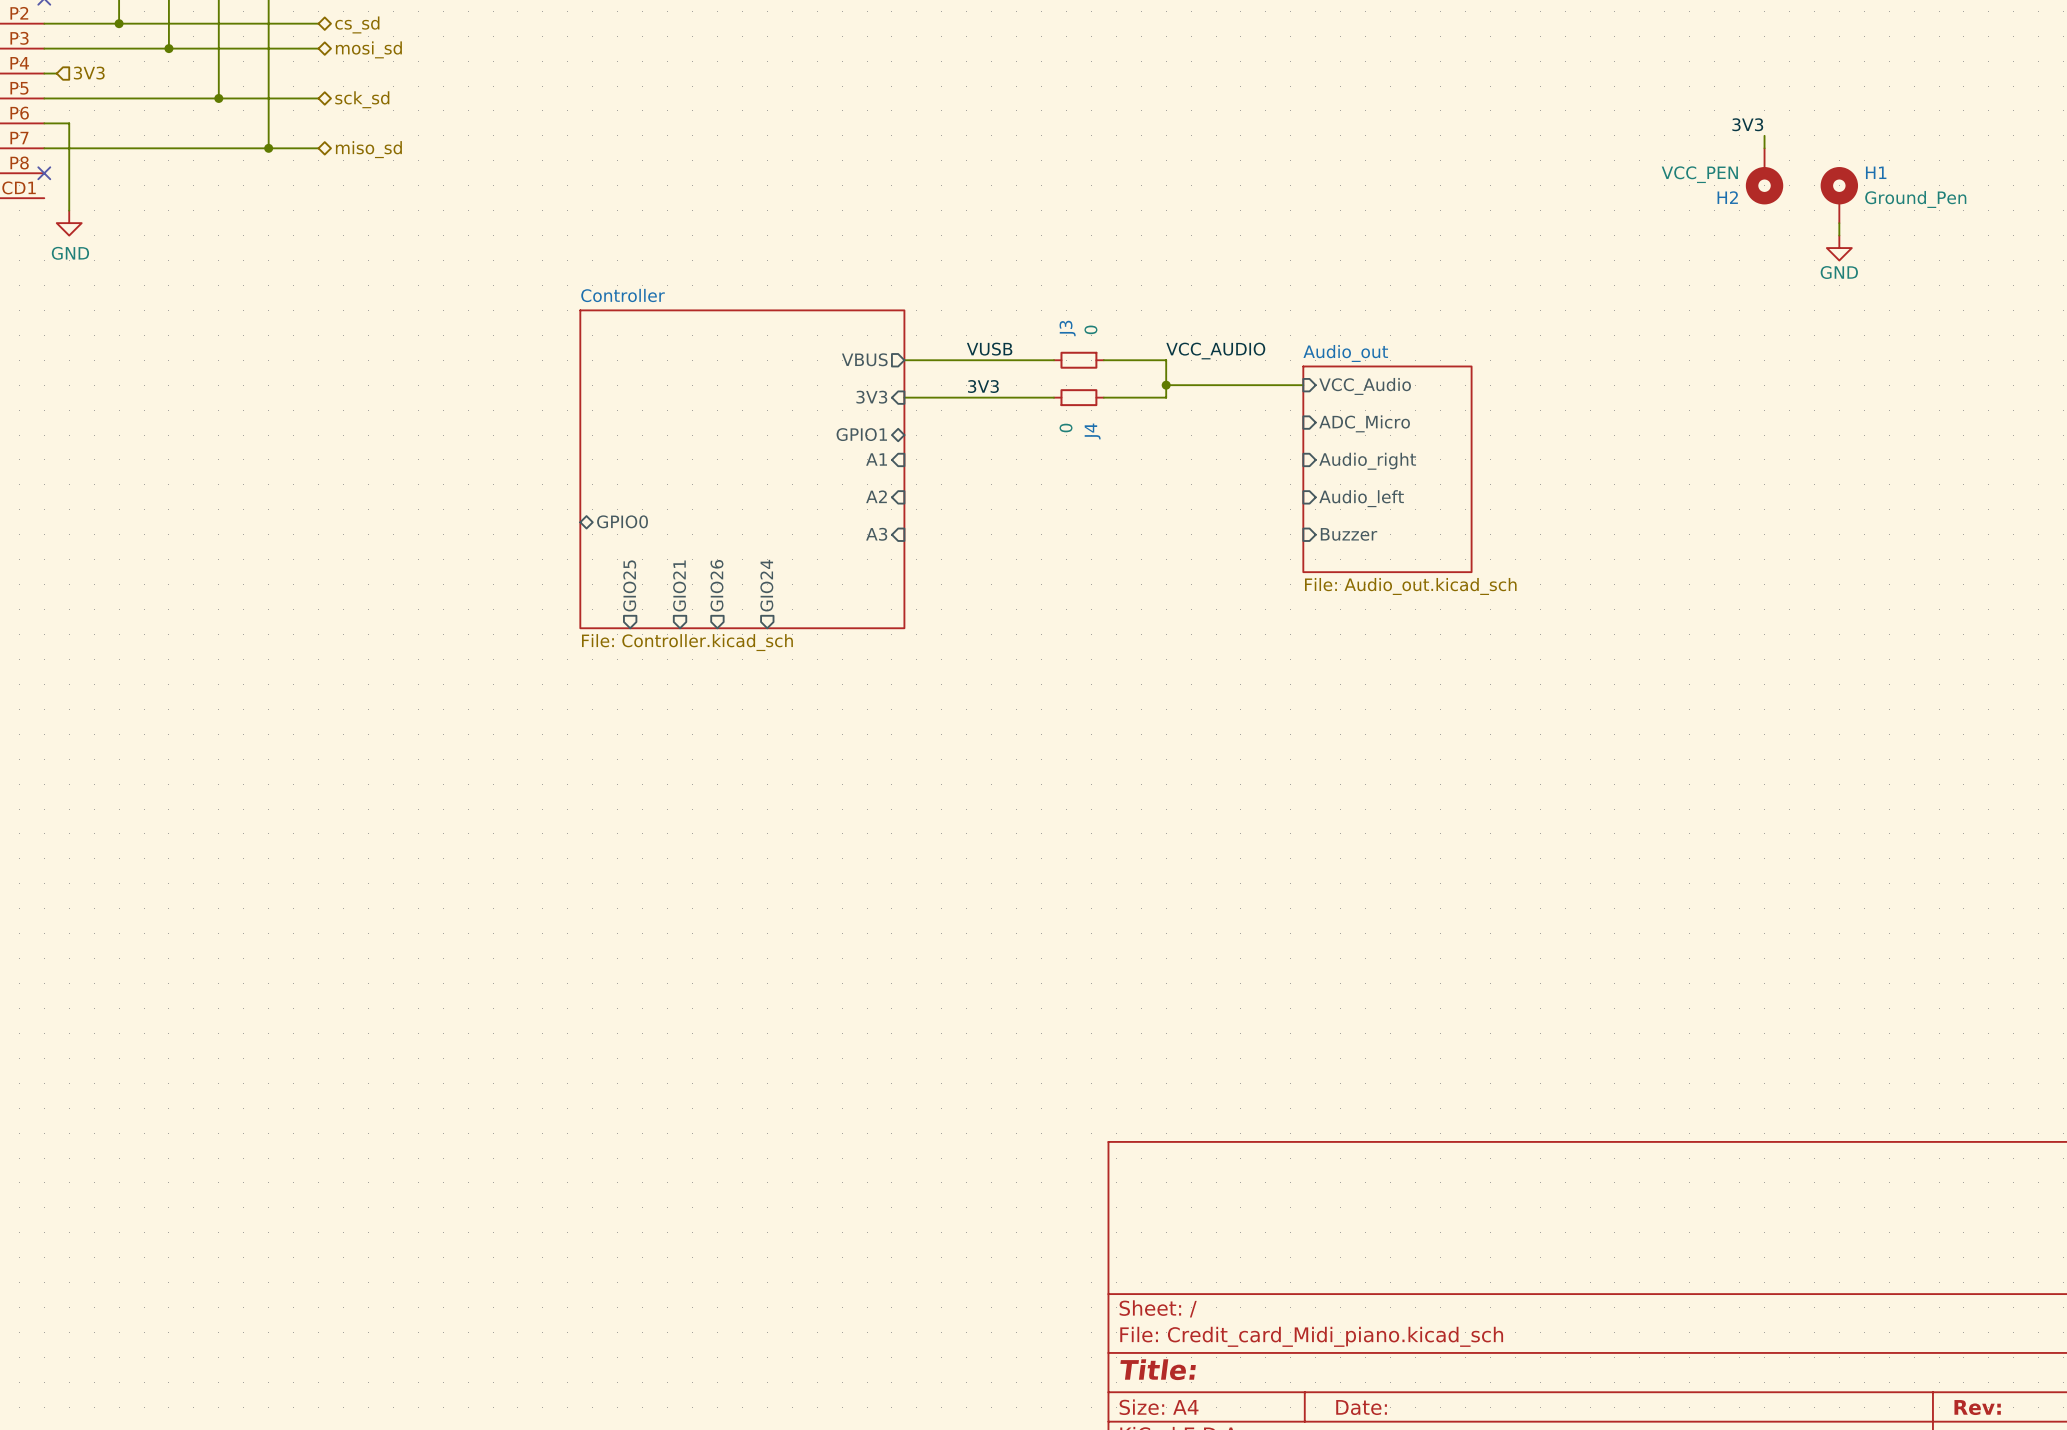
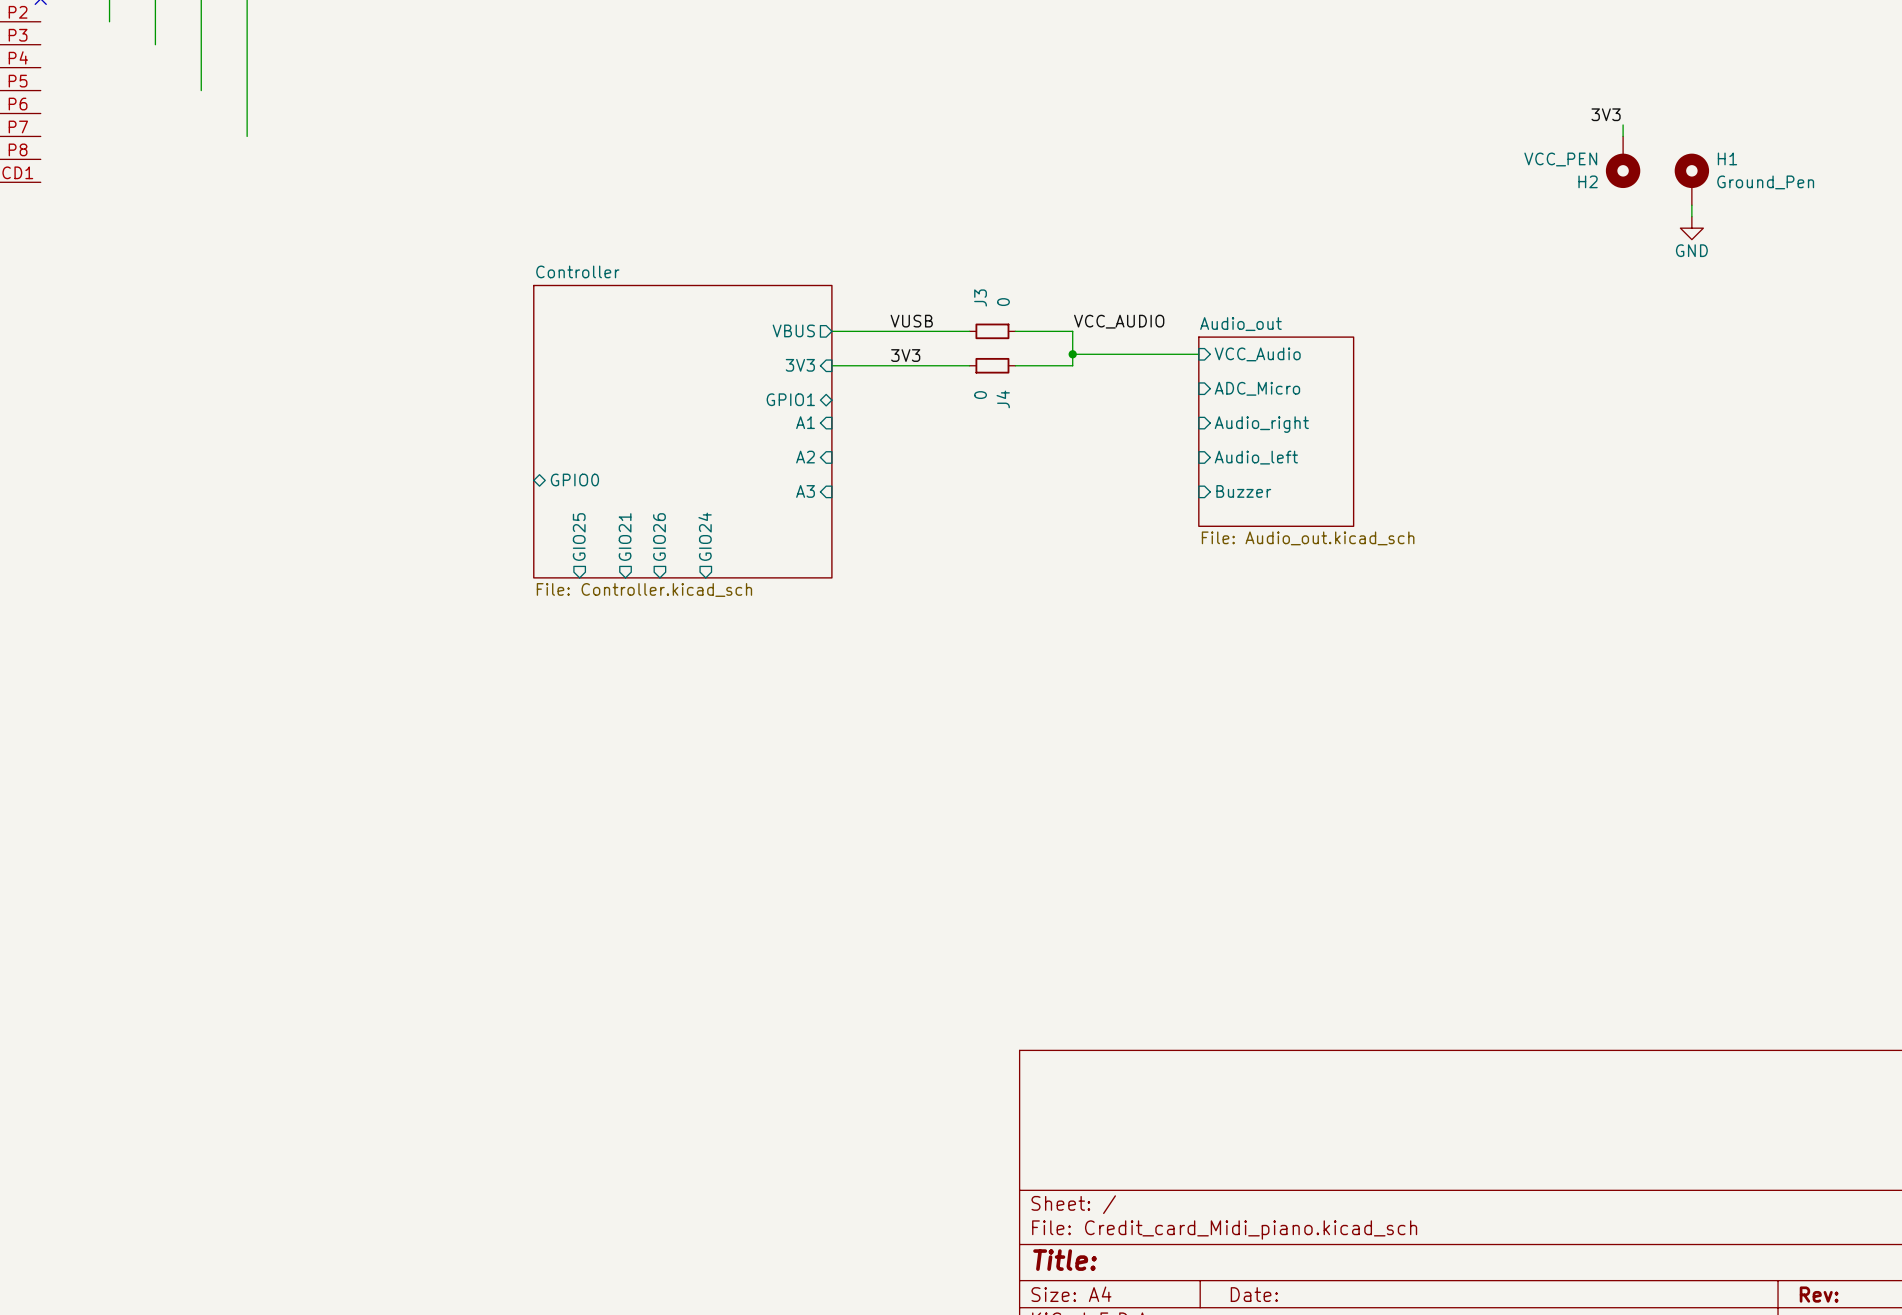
wire: (44, 23) (318, 23) -> none
junction: (119, 23) -> none
hierarchical label: cs_sd (357, 24) -> none
wire: (44, 48) (318, 48) -> none
junction: (168, 48) -> none
hierarchical label: mosi_sd (368, 49) -> none
wire: (44, 73) (56, 73) -> none
hierarchical label: 3V3 (89, 73) -> none
wire: (44, 98) (318, 98) -> none
junction: (218, 98) -> none
hierarchical label: sck_sd (362, 99) -> none
wire: (44, 123) (69, 123) (69, 210) -> none
wire: (44, 148) (318, 148) -> none
junction: (268, 148) -> none
hierarchical label: miso_sd (368, 149) -> none
no-connect mark: (44, 173) -> none
power symbol: GND (69, 223) -> none

